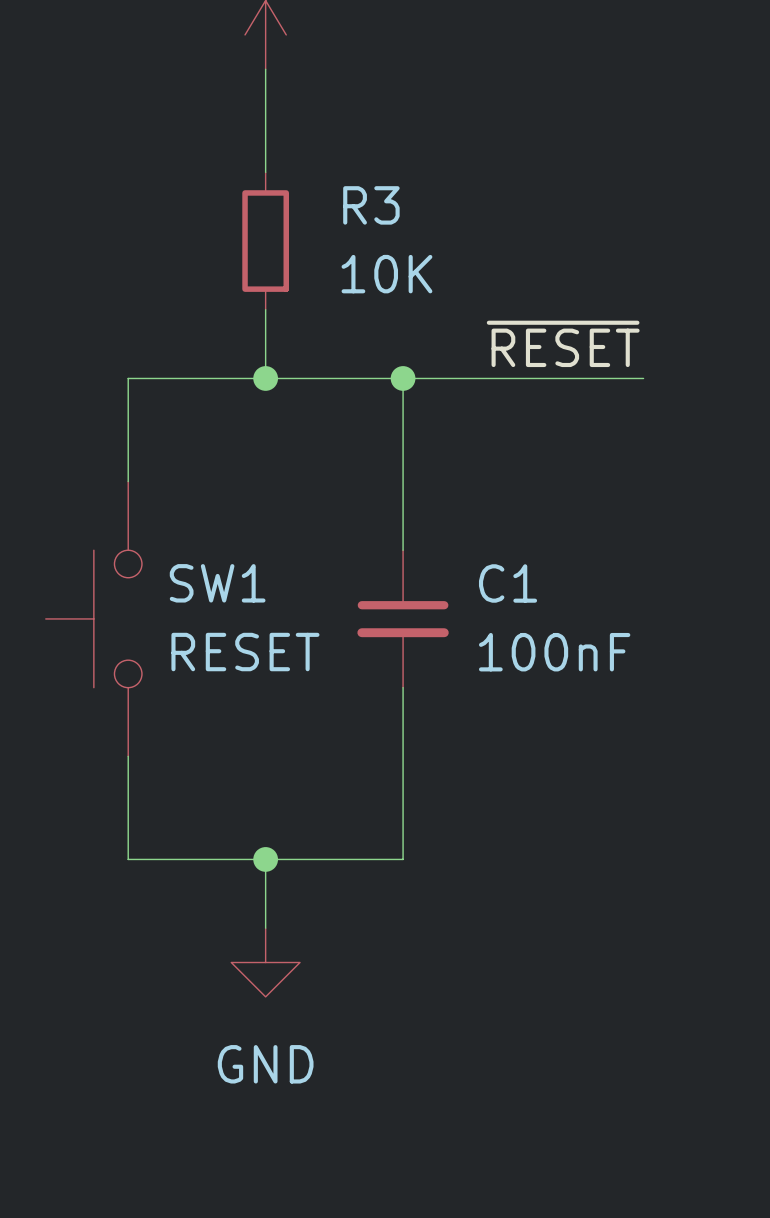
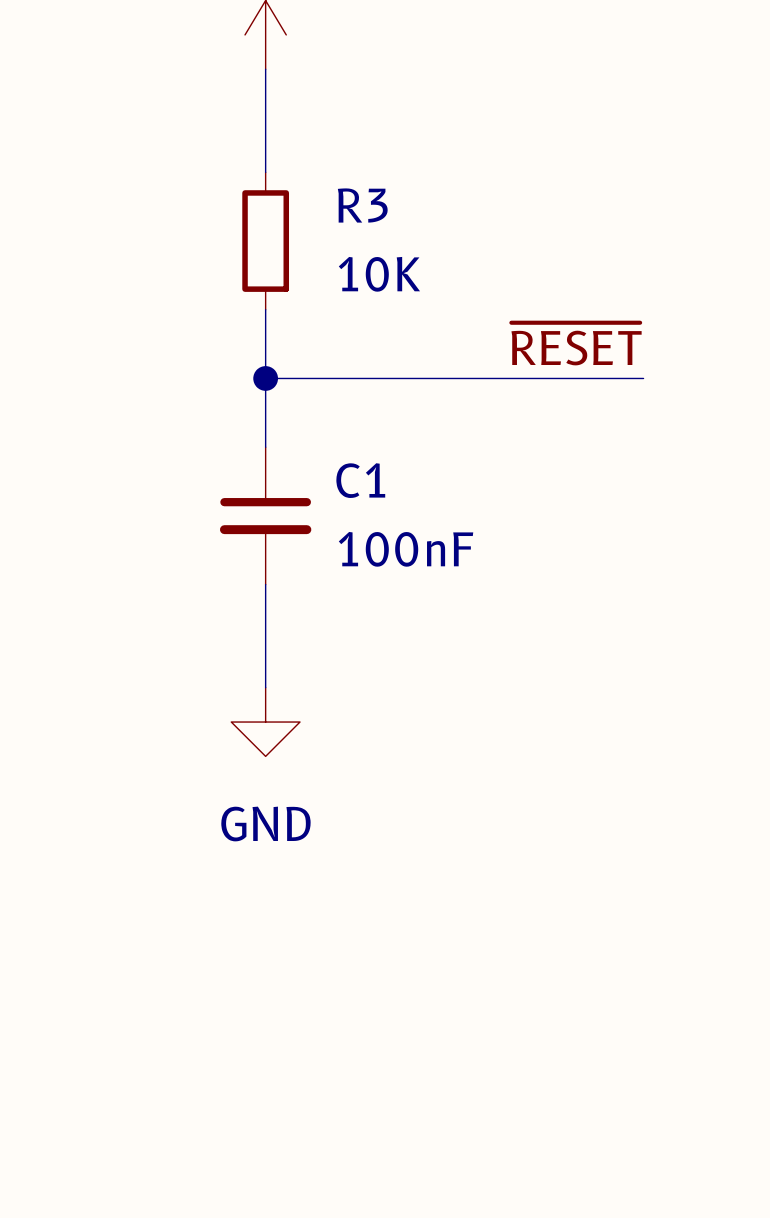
wire: (265, 378) (128, 378) (128, 481) -> (265, 378) (265, 447)
wire: (403, 378) (403, 550) -> none
junction: (403, 378) -> none
wire: none -> (265, 584) (265, 687)
SW1: RESET (93, 618) -> none
C1 position: (403, 618) -> (265, 515)
wire: (403, 687) (403, 859) (128, 859) (128, 756) -> none
wire: (265, 859) (265, 928) -> none
junction: (265, 859) -> none
power symbol position: GND (265, 962) -> GND (265, 722)

